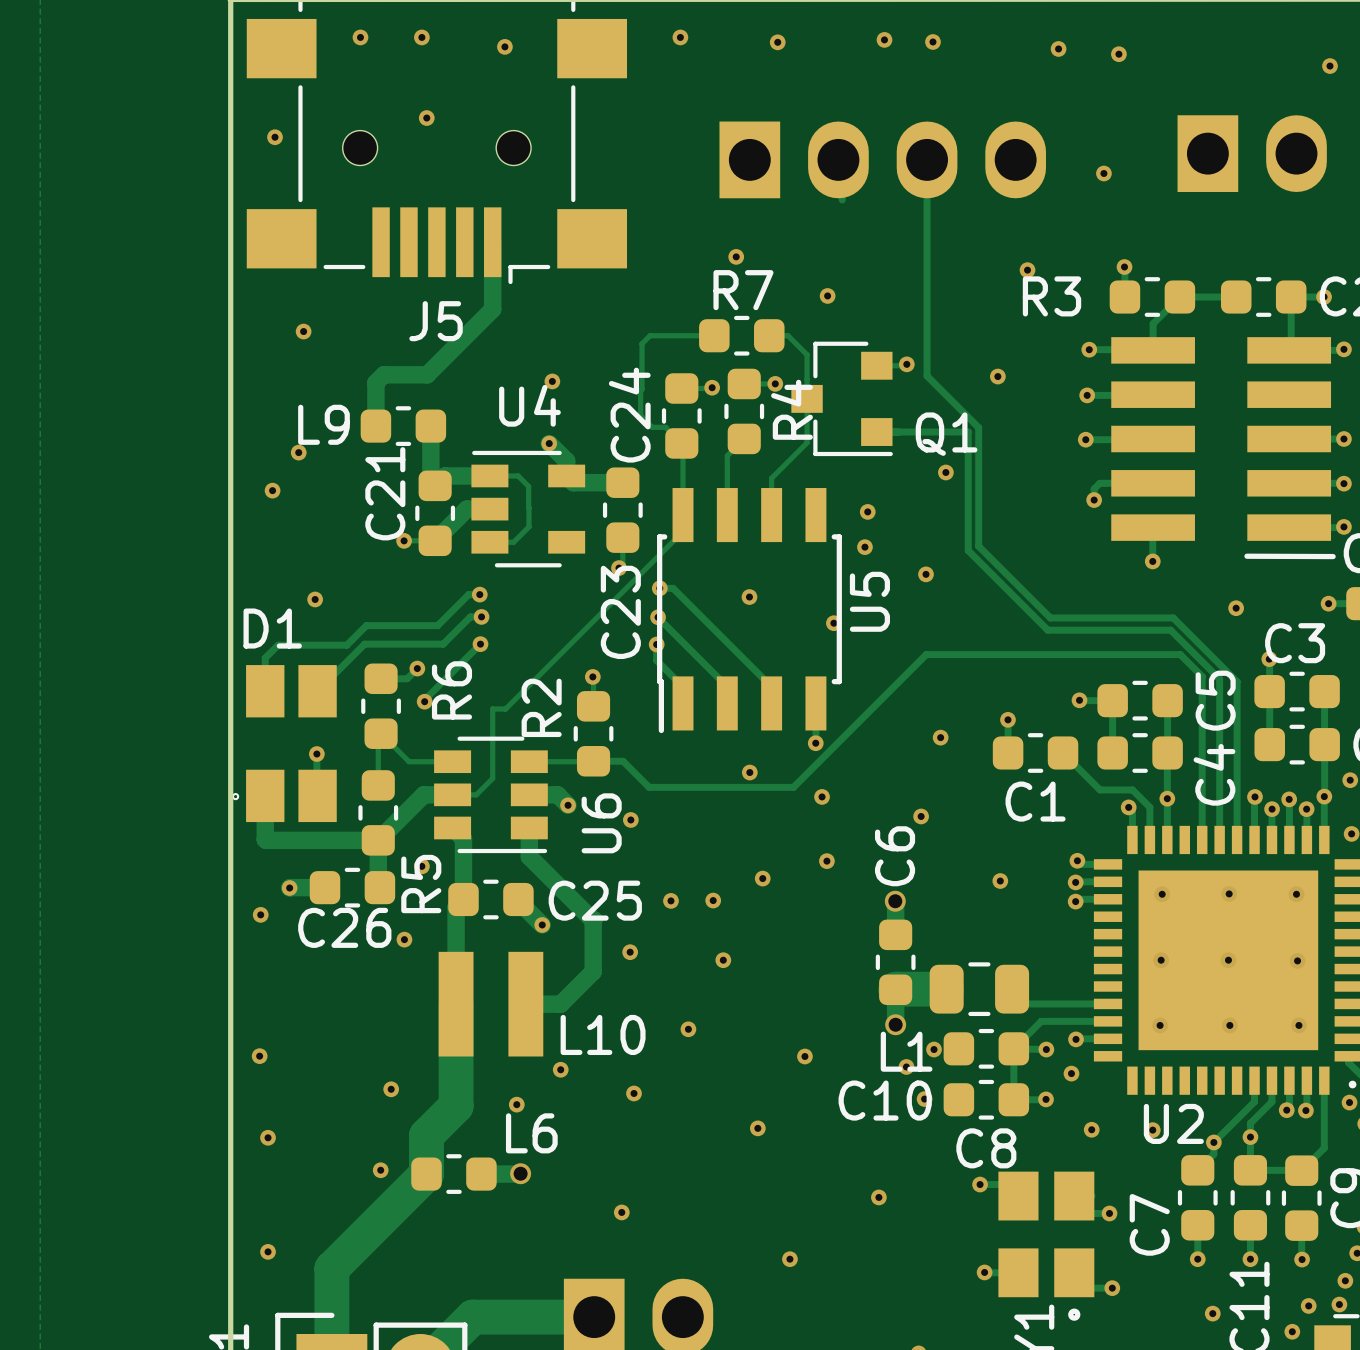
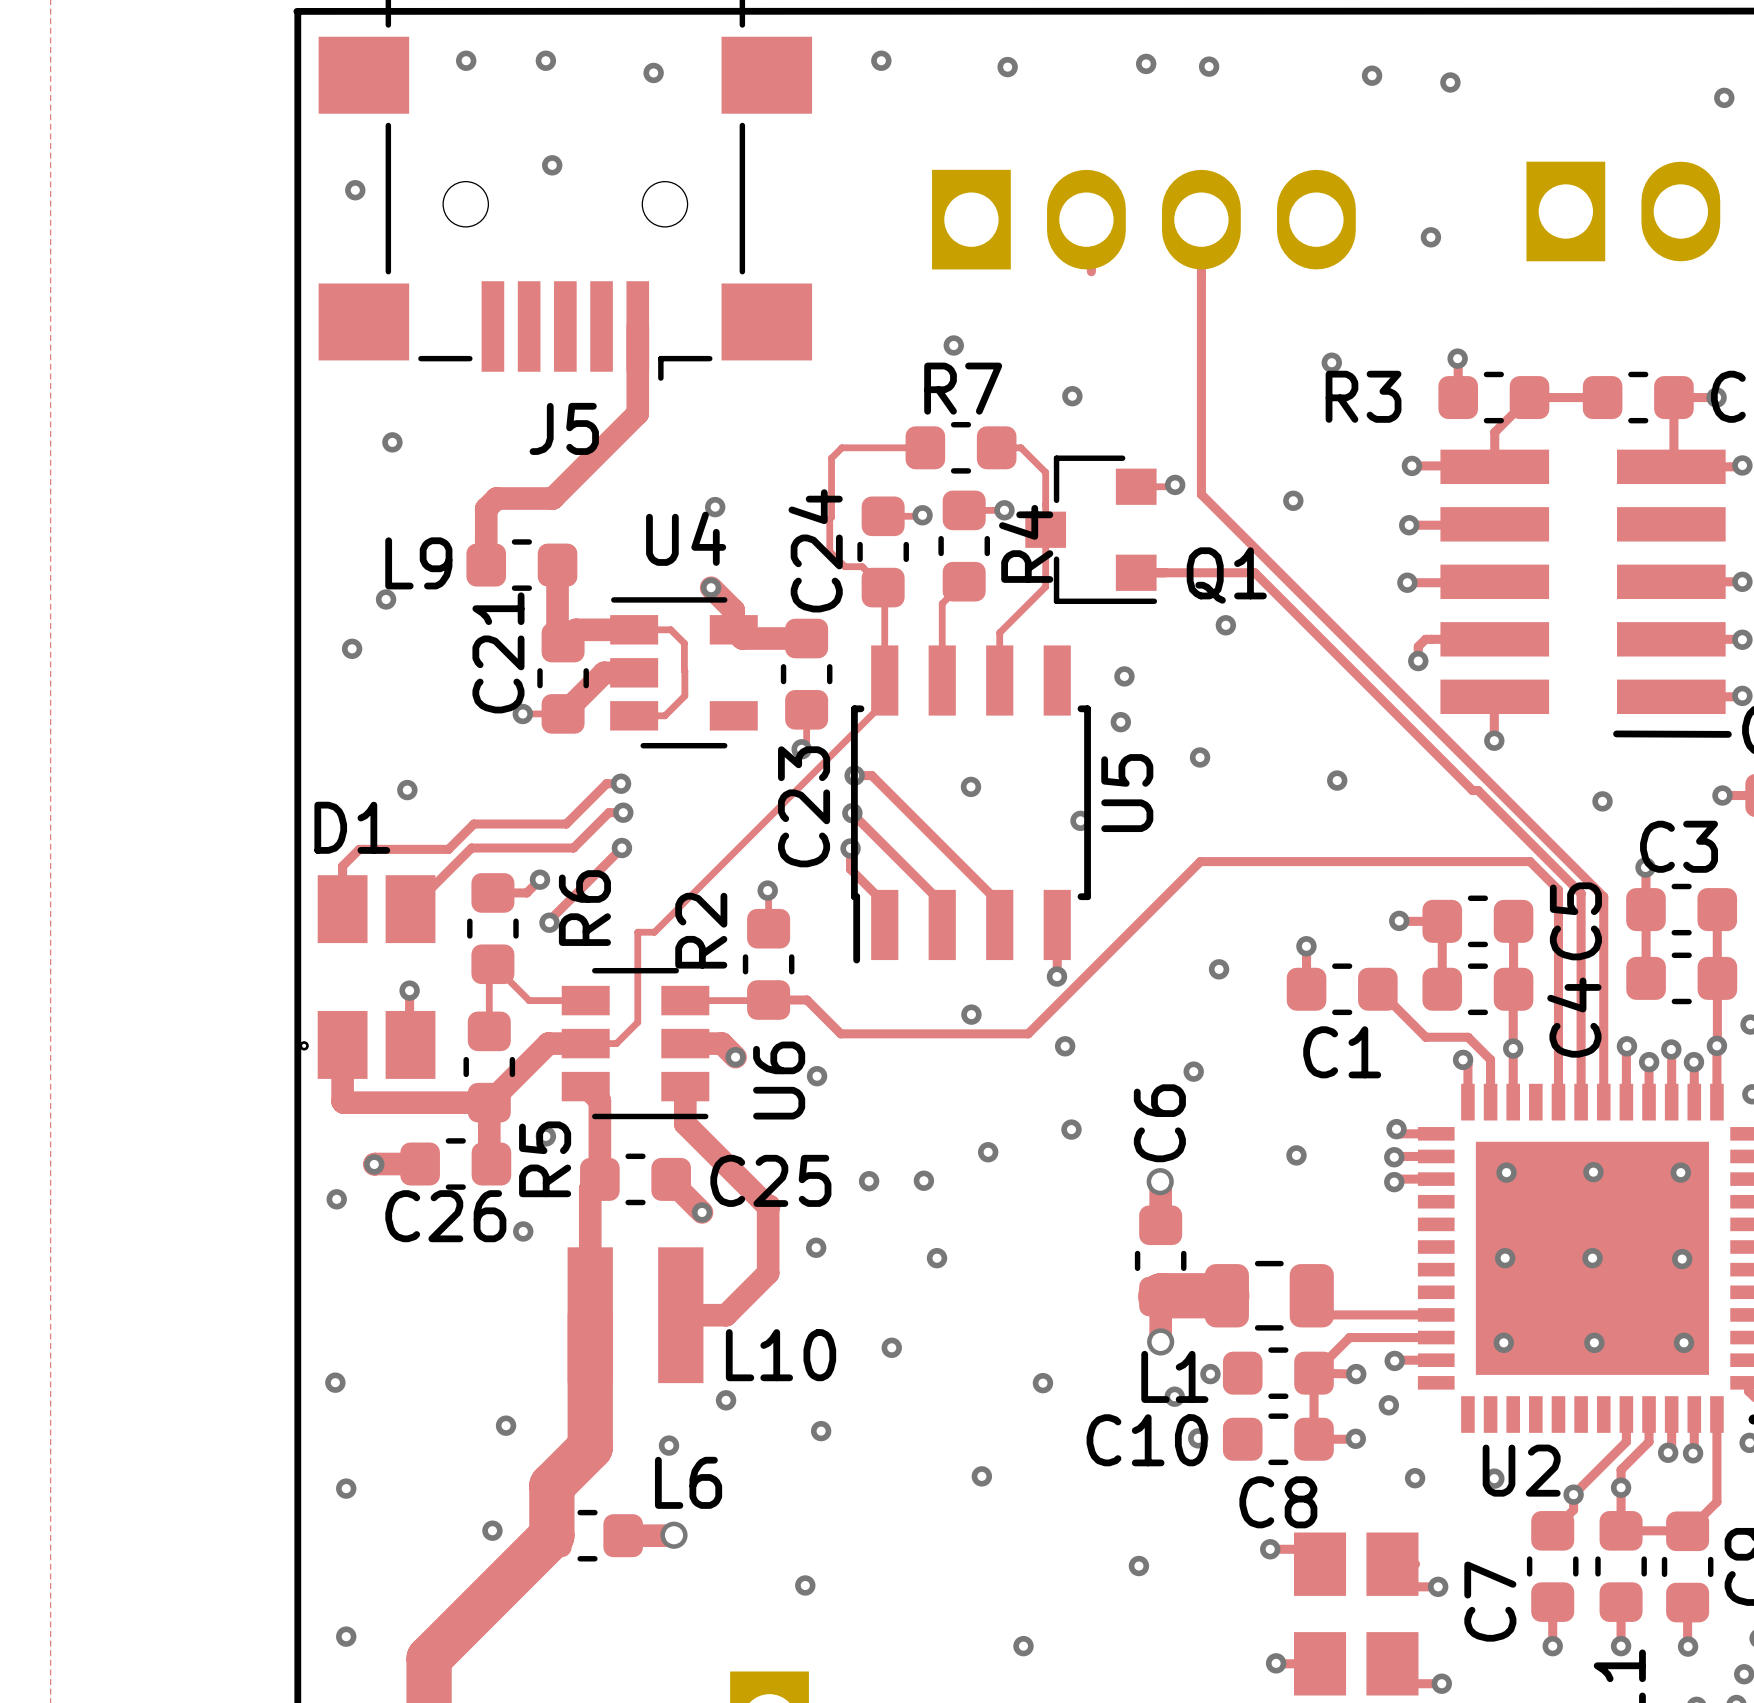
track: (927, 371) (927, 376) (978, 427) (978, 546) (1050, 617) (1173, 617) -> (1201, 494) (1520, 814)
track: (968, 432) (968, 550) (1047, 630) (1170, 630) -> (1254, 572) (1472, 790) (1478, 790) (1517, 829)
via: none -> (1337, 780)

